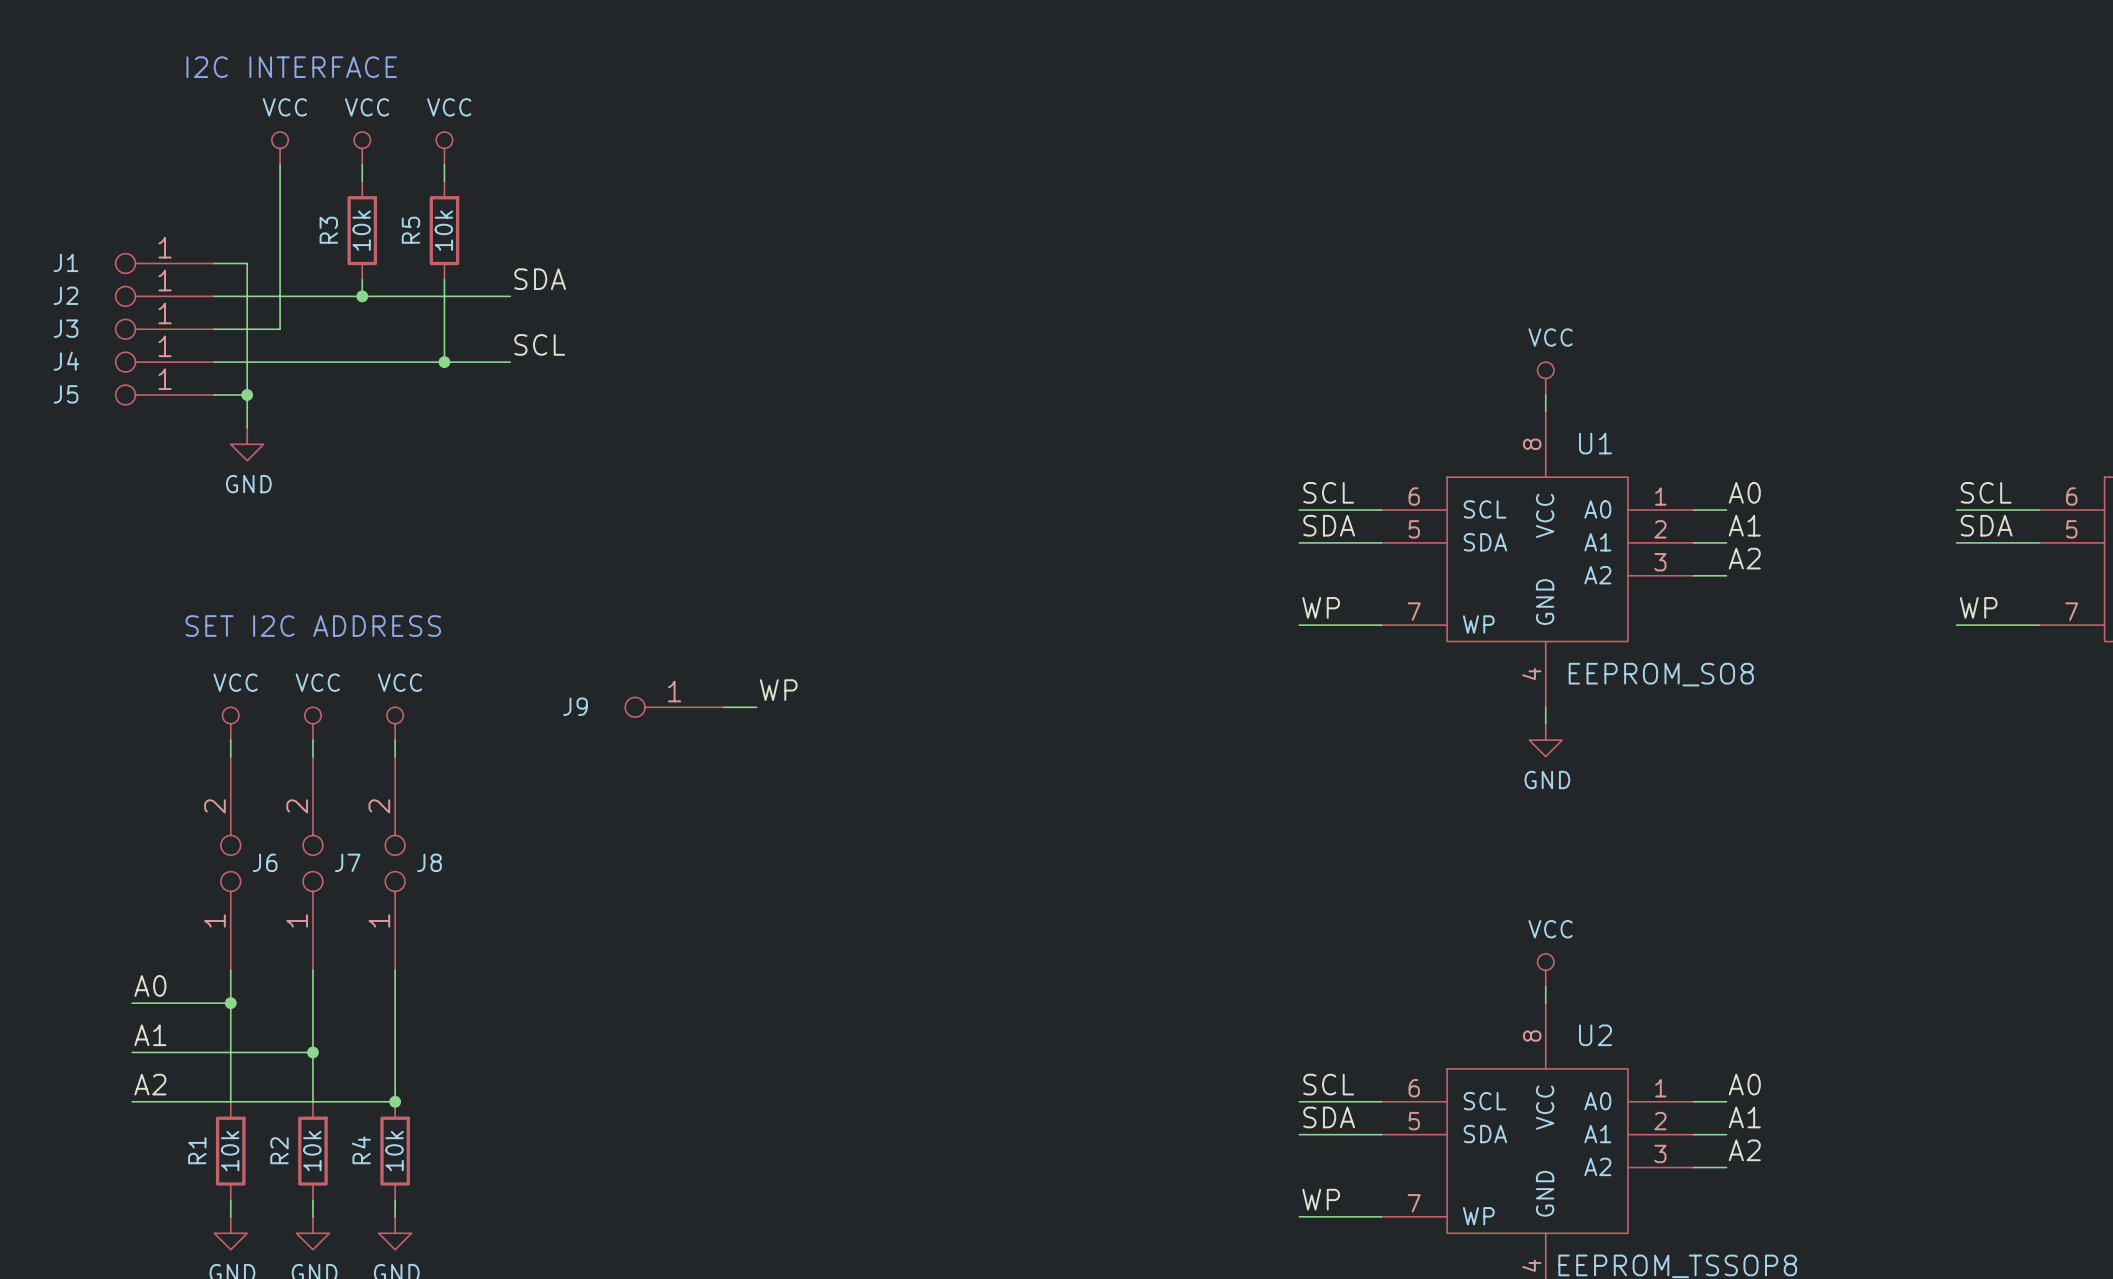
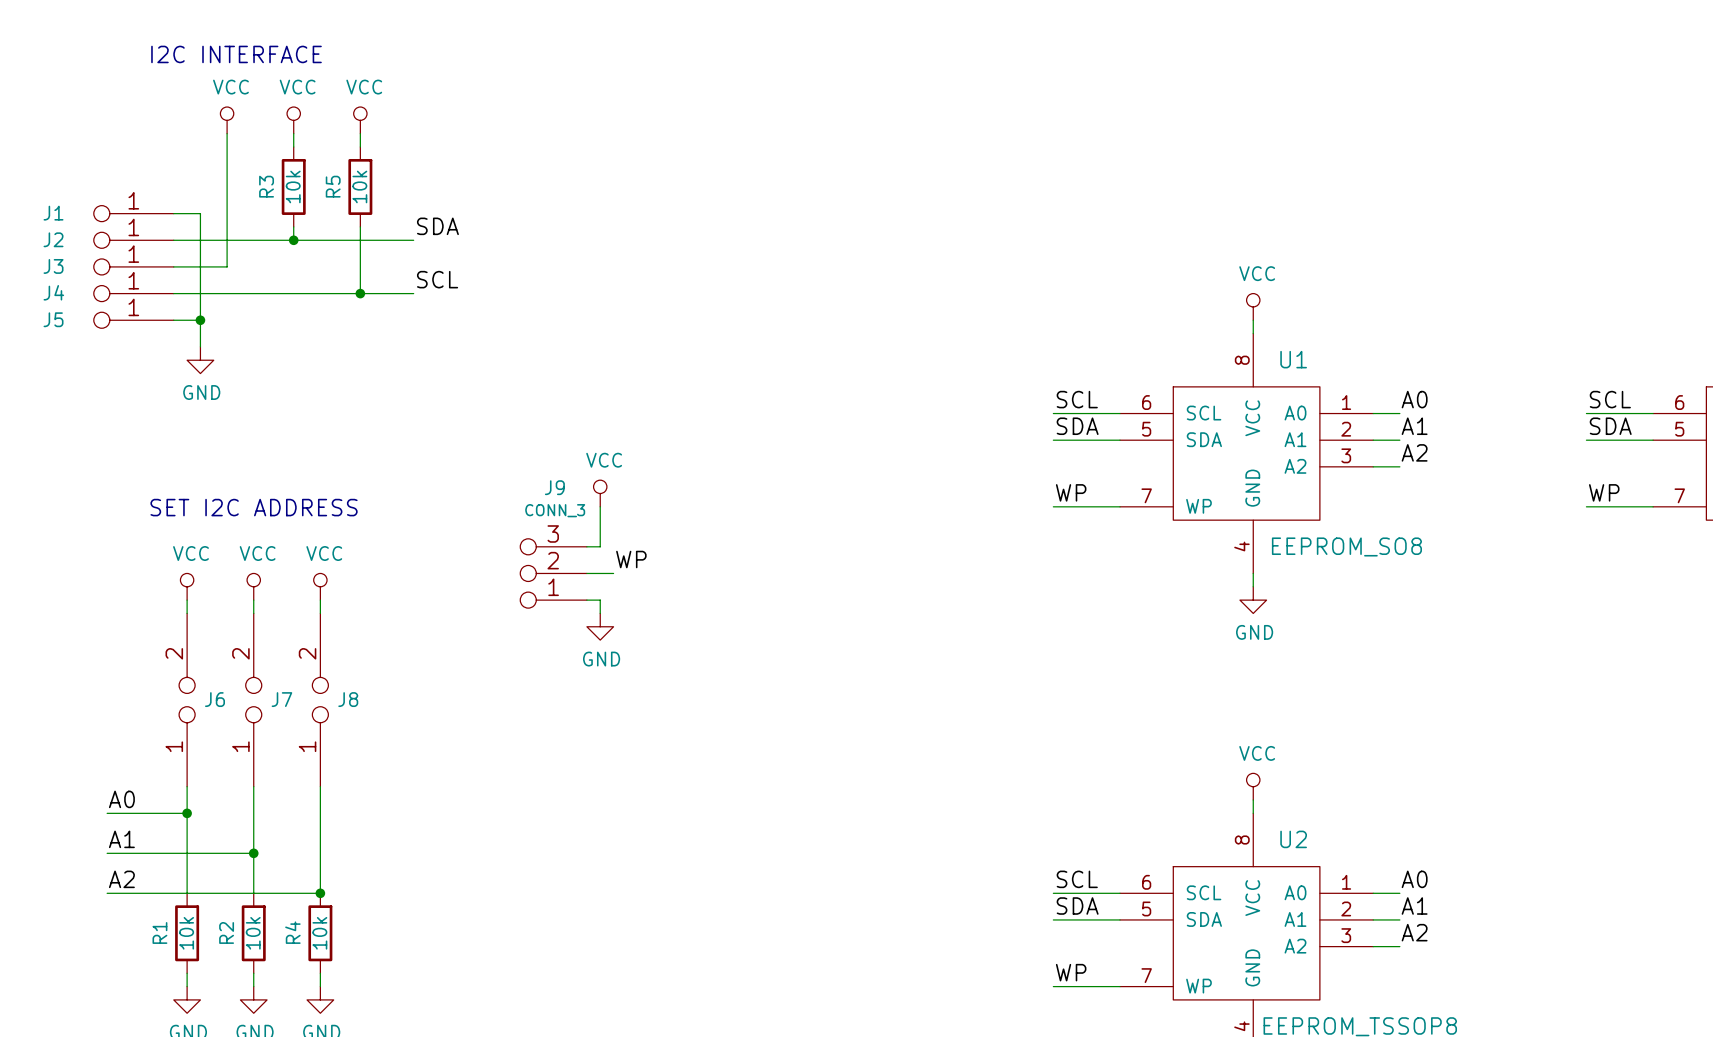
power symbol: none -> VCC (600, 493)
wire: none -> (600, 506) (600, 546) (586, 546)
J9 value: none -> CONN_3 (555, 510)
J9 symbol: [625, 697, 724, 718] -> [520, 538, 587, 609]
J9 name position: J9 (575, 706) -> J9 (554, 487)
wire: none -> (586, 600) (600, 600) (600, 613)
power symbol: none -> GND (600, 626)

